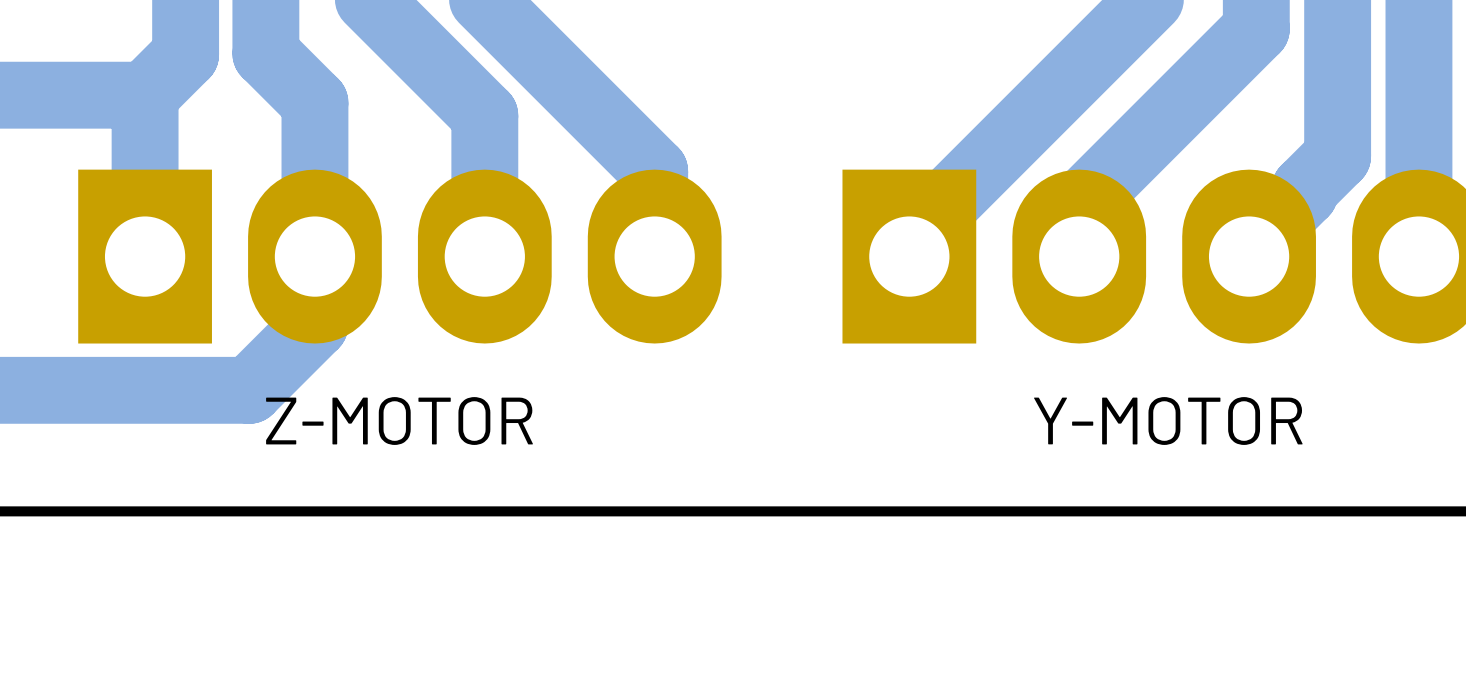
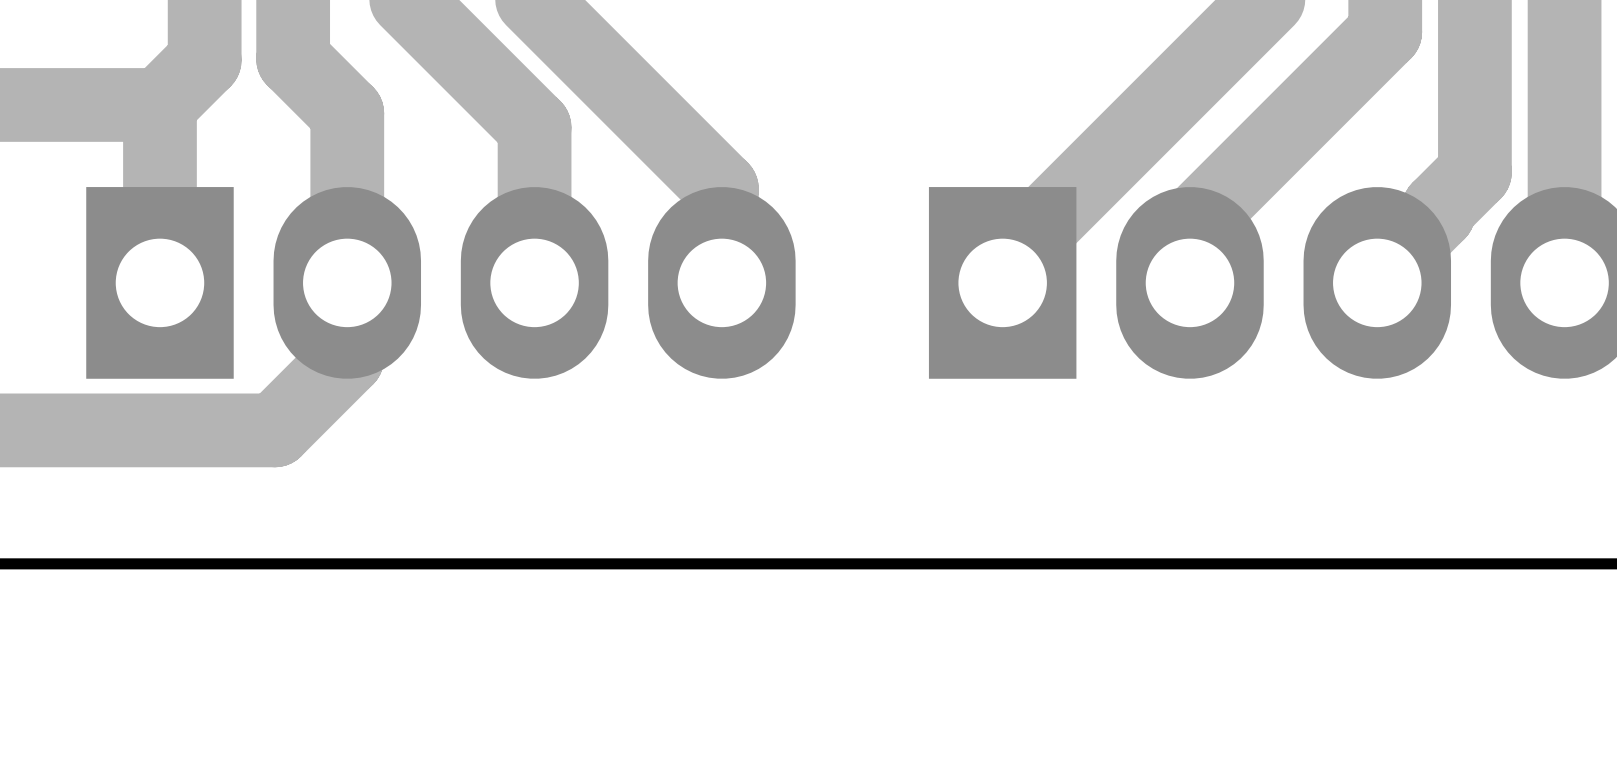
text: Z-MOTOR (399, 421) -> none
text: Y-MOTOR (1168, 421) -> none

